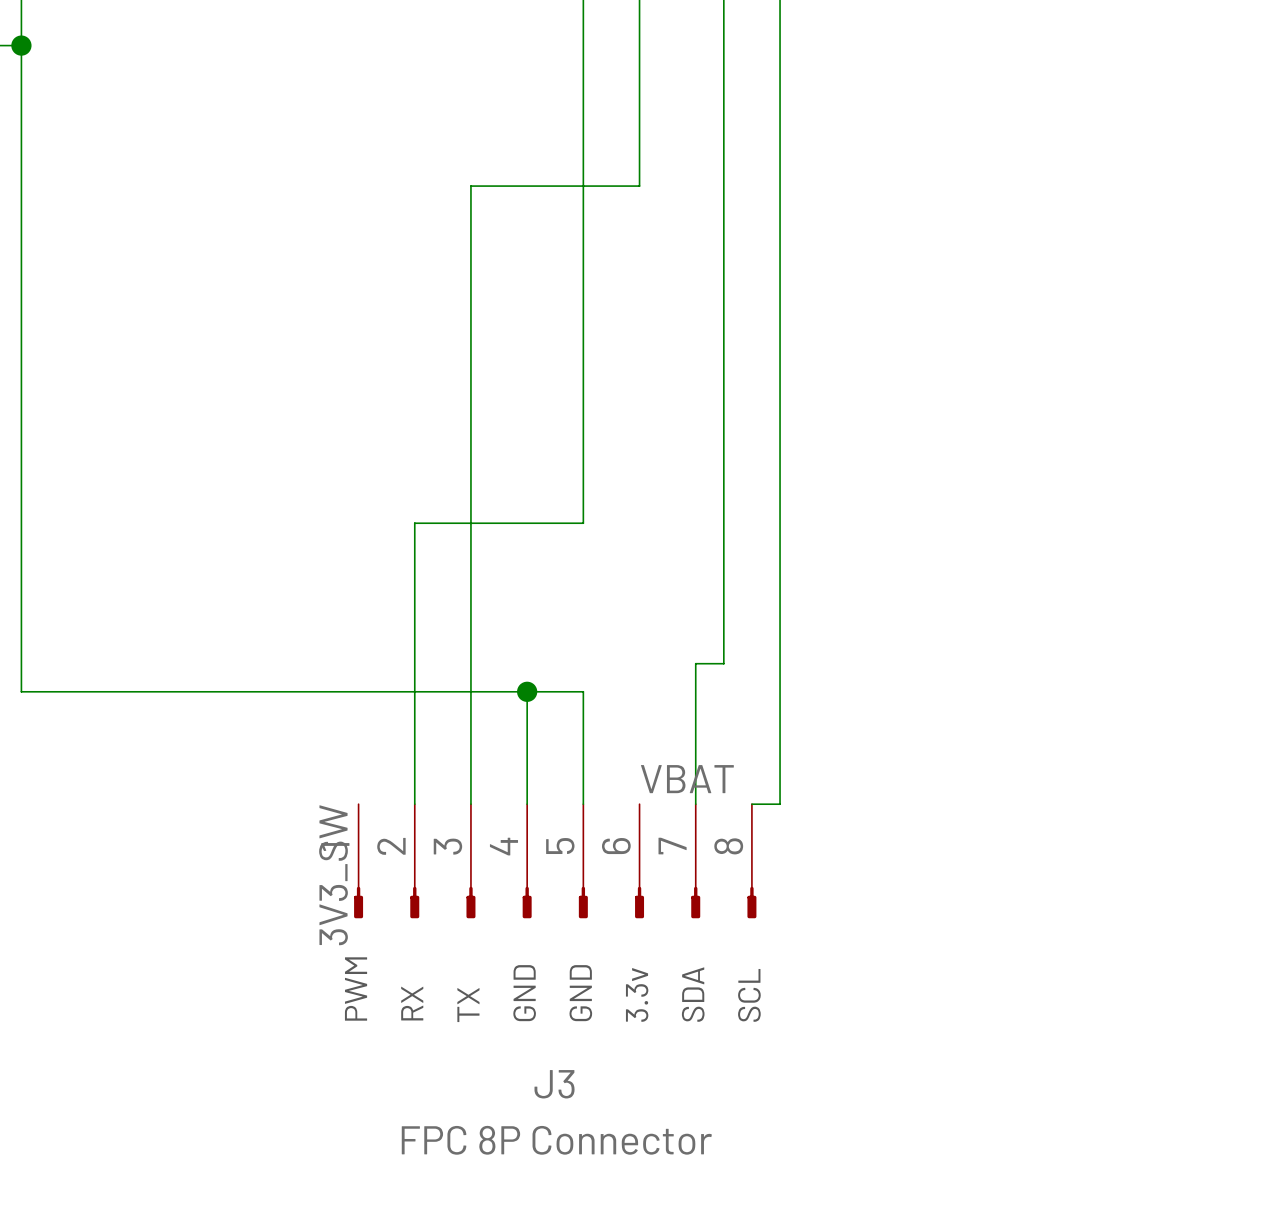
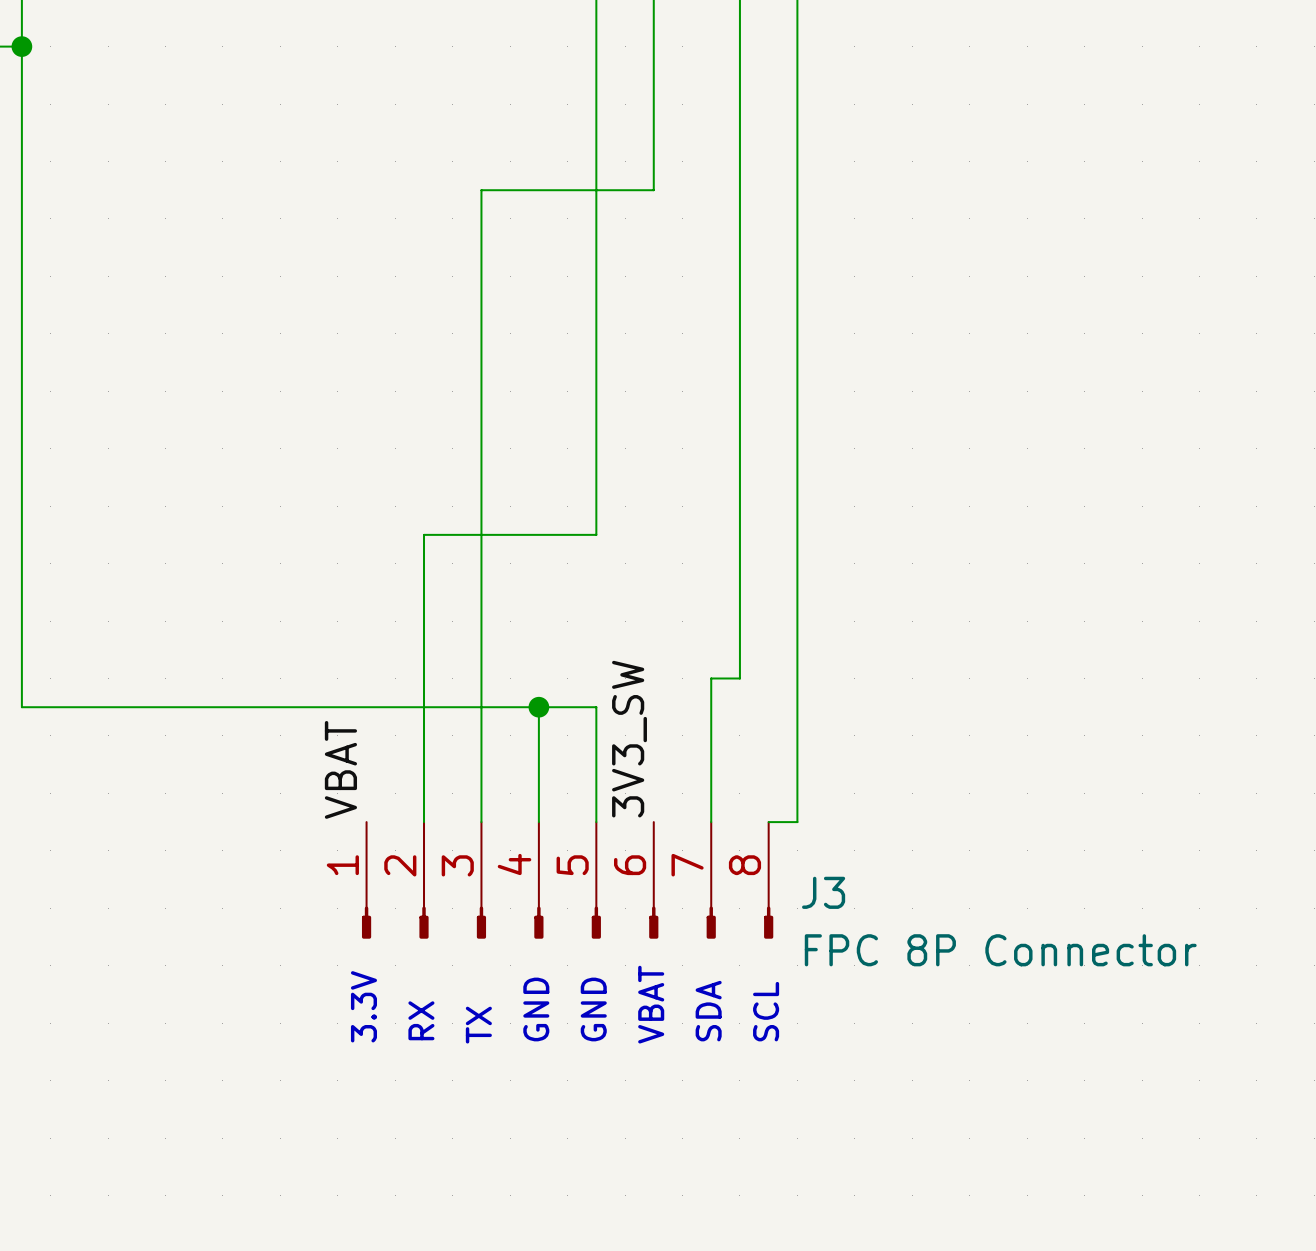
label: VBAT (687, 779) -> 3V3_SW (629, 739)
label: 3V3_SW (333, 875) -> VBAT (340, 769)
text: PWM (356, 989) -> 3.3V (363, 1006)
text: 3.3v (637, 994) -> VBAT (651, 1004)
J3 name position: J3 (554, 1084) -> J3 (823, 892)
J3 value position: FPC 8P Connector (556, 1140) -> FPC 8P Connector (1000, 950)

